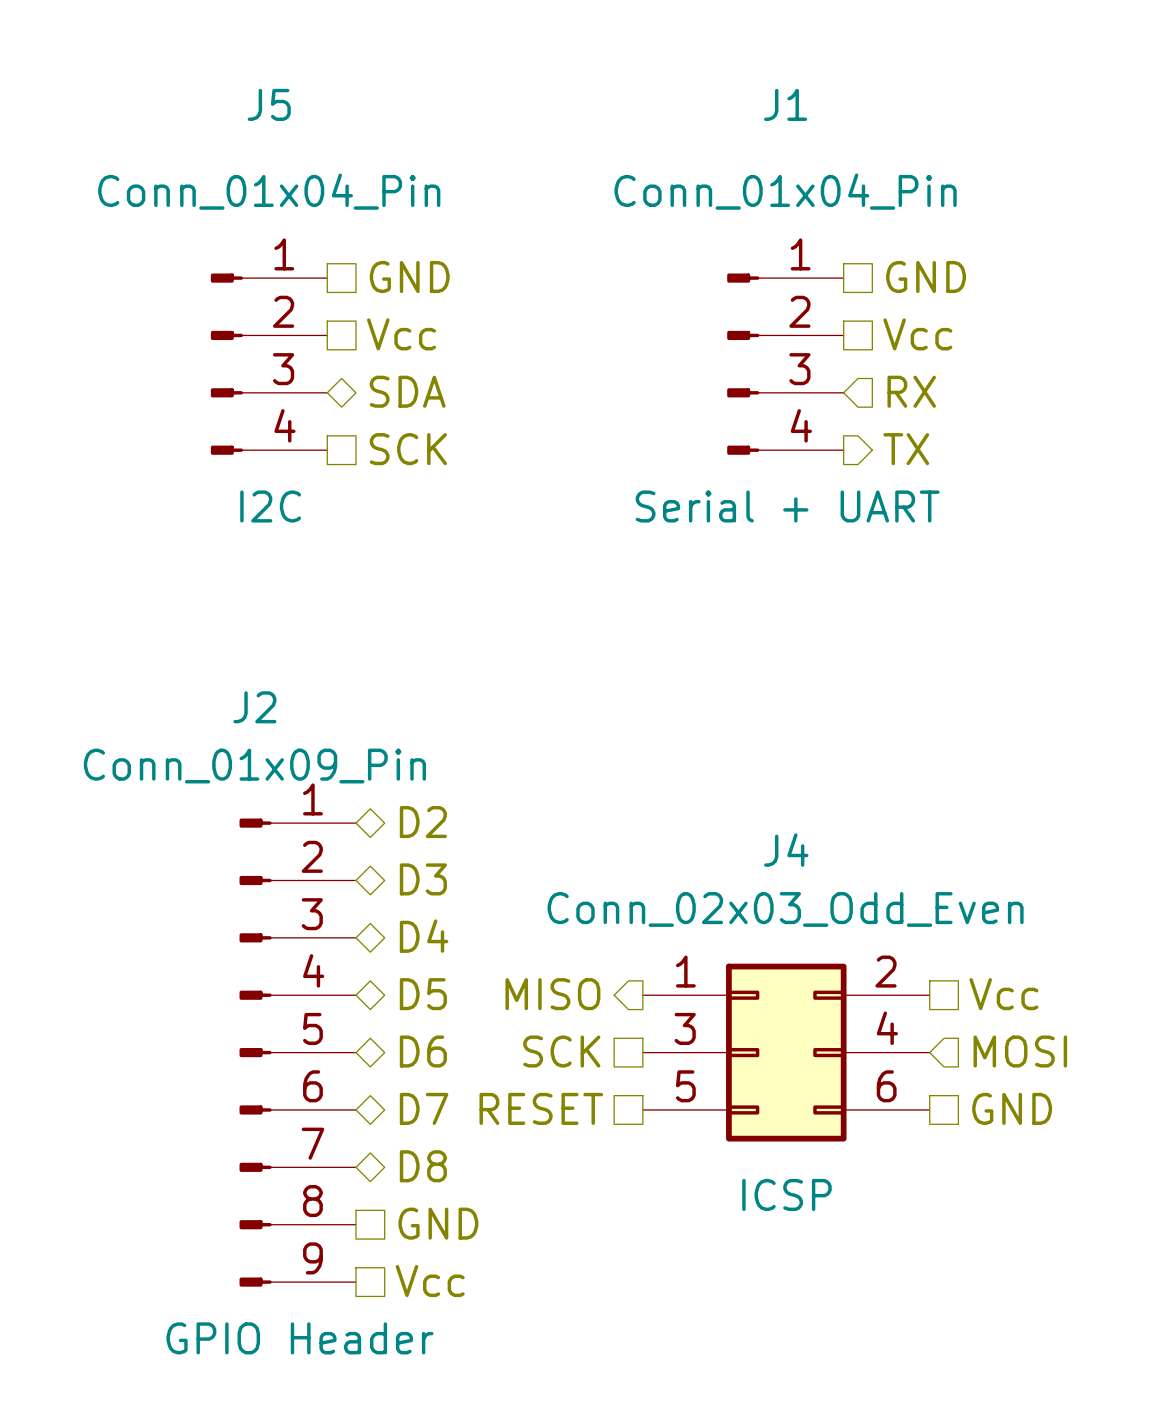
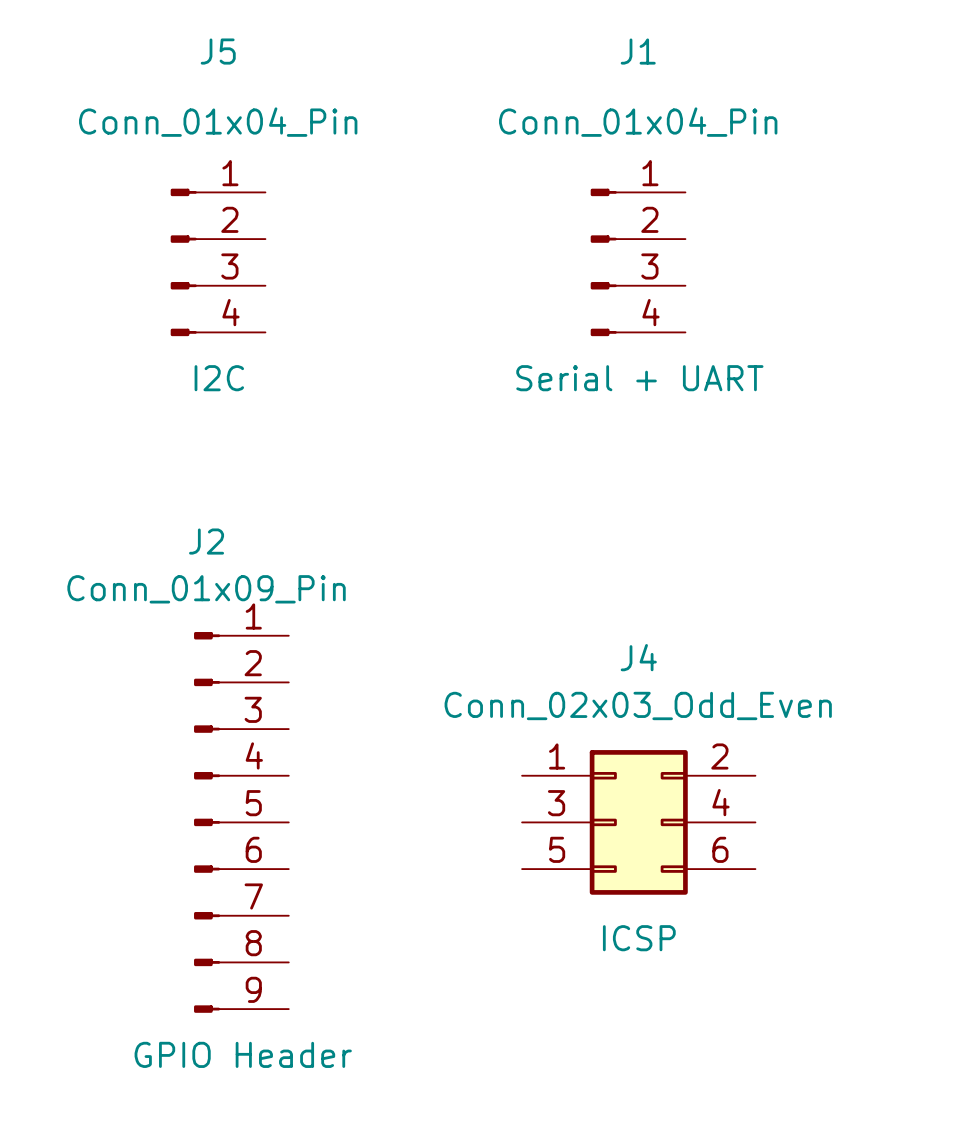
hierarchical label: GND (409, 277) -> none
hierarchical label: GND (926, 277) -> none
hierarchical label: Vcc (401, 334) -> none
hierarchical label: Vcc (917, 334) -> none
hierarchical label: SDA (407, 391) -> none
hierarchical label: RX (911, 391) -> none
hierarchical label: SCK (408, 449) -> none
hierarchical label: TX (906, 449) -> none
hierarchical label: D2 (423, 822) -> none
hierarchical label: D3 (423, 879) -> none
hierarchical label: D4 (424, 936) -> none
hierarchical label: D5 (423, 994) -> none
hierarchical label: MISO (552, 994) -> none
hierarchical label: Vcc (1003, 994) -> none
hierarchical label: D6 (423, 1051) -> none
hierarchical label: SCK (561, 1051) -> none
hierarchical label: MOSI (1020, 1051) -> none
hierarchical label: D7 (424, 1108) -> none
hierarchical label: RESET (541, 1108) -> none
hierarchical label: GND (1012, 1108) -> none
hierarchical label: D8 (423, 1166) -> none
hierarchical label: GND (438, 1223) -> none
hierarchical label: Vcc (430, 1281) -> none

